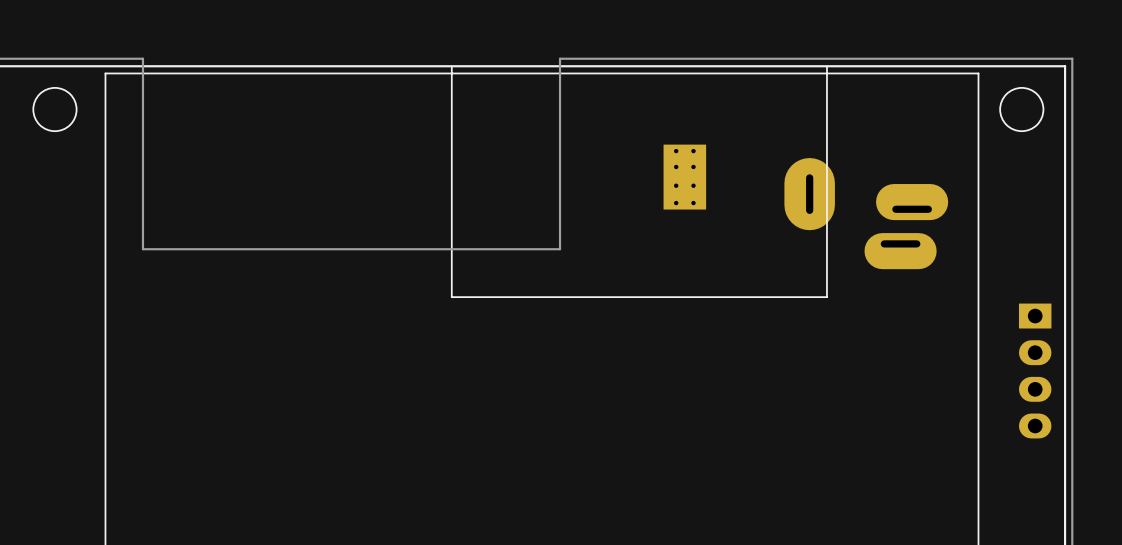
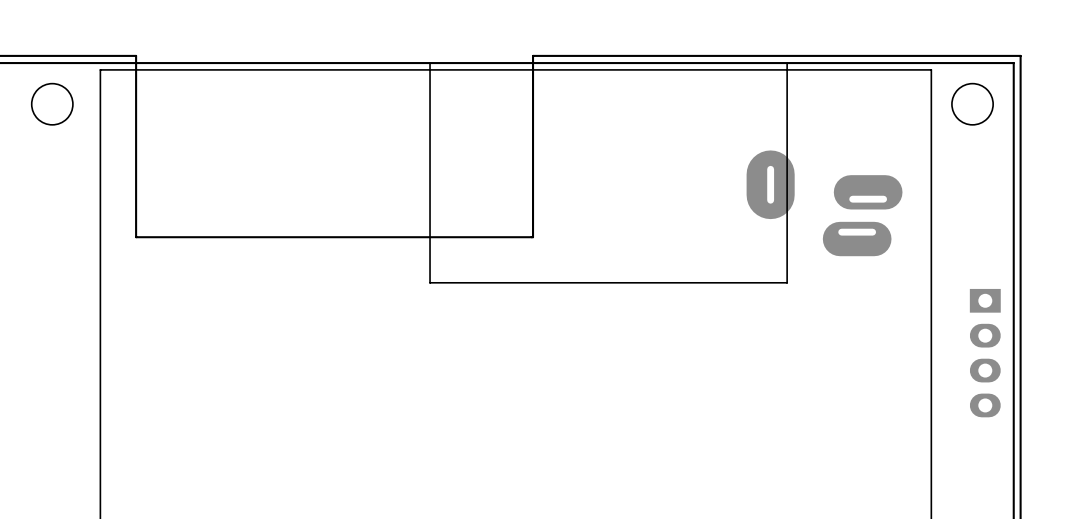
part: (684, 177) -> none

